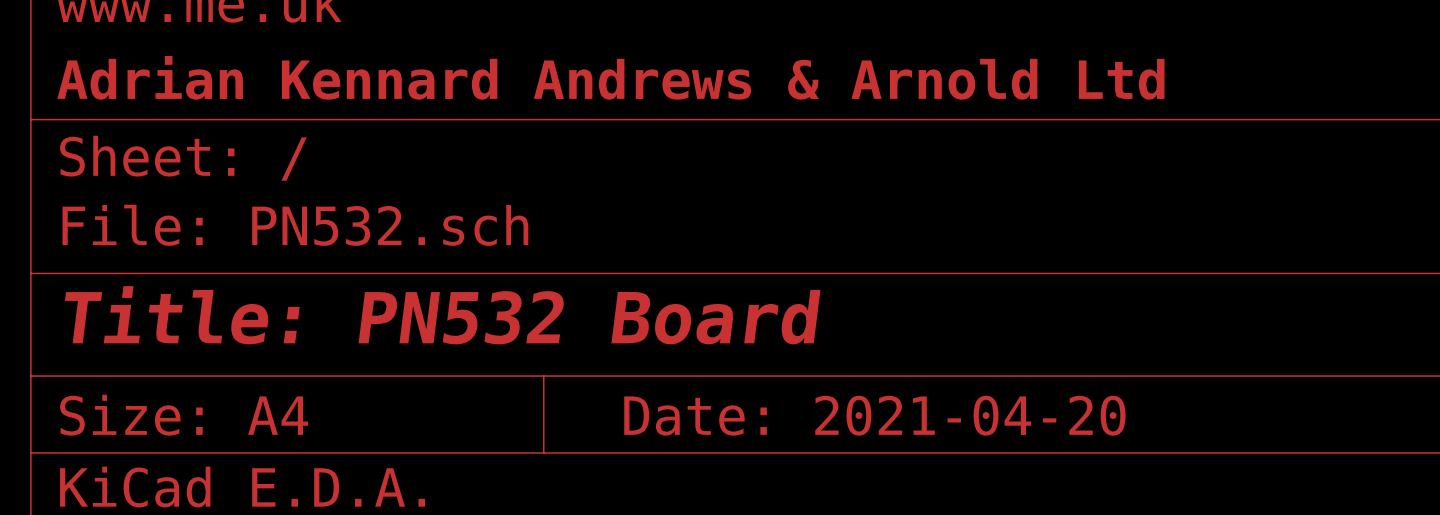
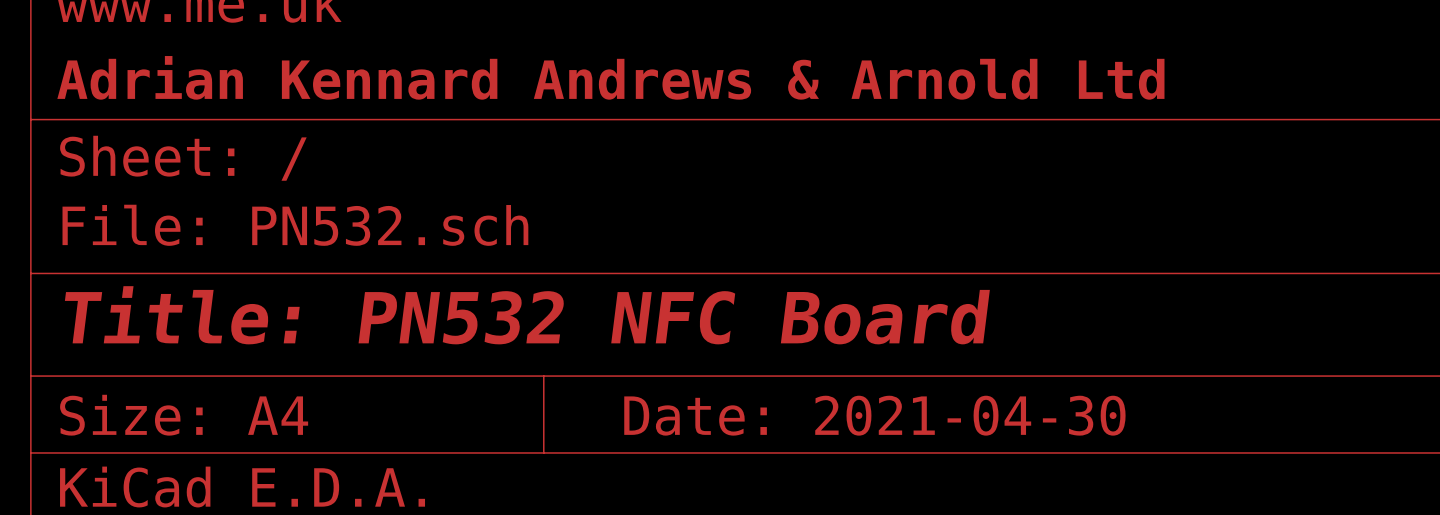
title block: Title: PN532 Board (442, 315) -> Title: PN532 NFC Board (527, 315)
title block: Date: 2021-04-20 (874, 415) -> Date: 2021-04-30 (874, 415)

